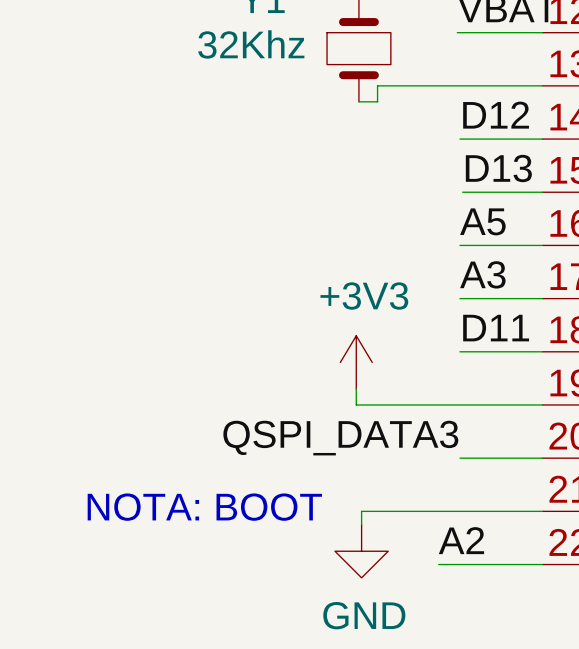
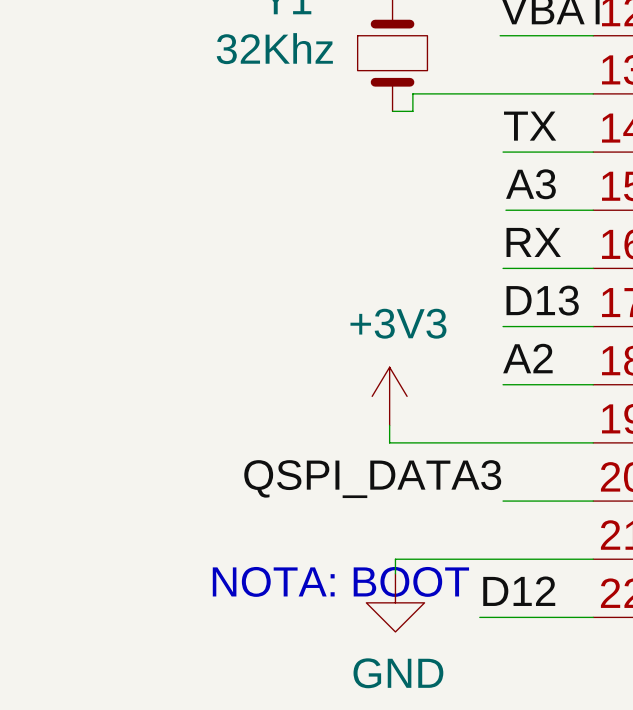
label: D12 (496, 115) -> TX (530, 126)
label: D13 (498, 168) -> A3 (530, 184)
label: A5 (482, 221) -> RX (533, 242)
label: A3 (482, 274) -> D13 (542, 300)
label: D11 (496, 328) -> A2 (527, 358)
text position: NOTA: BOOT (204, 507) -> NOTA: BOOT (340, 581)
label: A2 (461, 540) -> D12 (519, 591)

